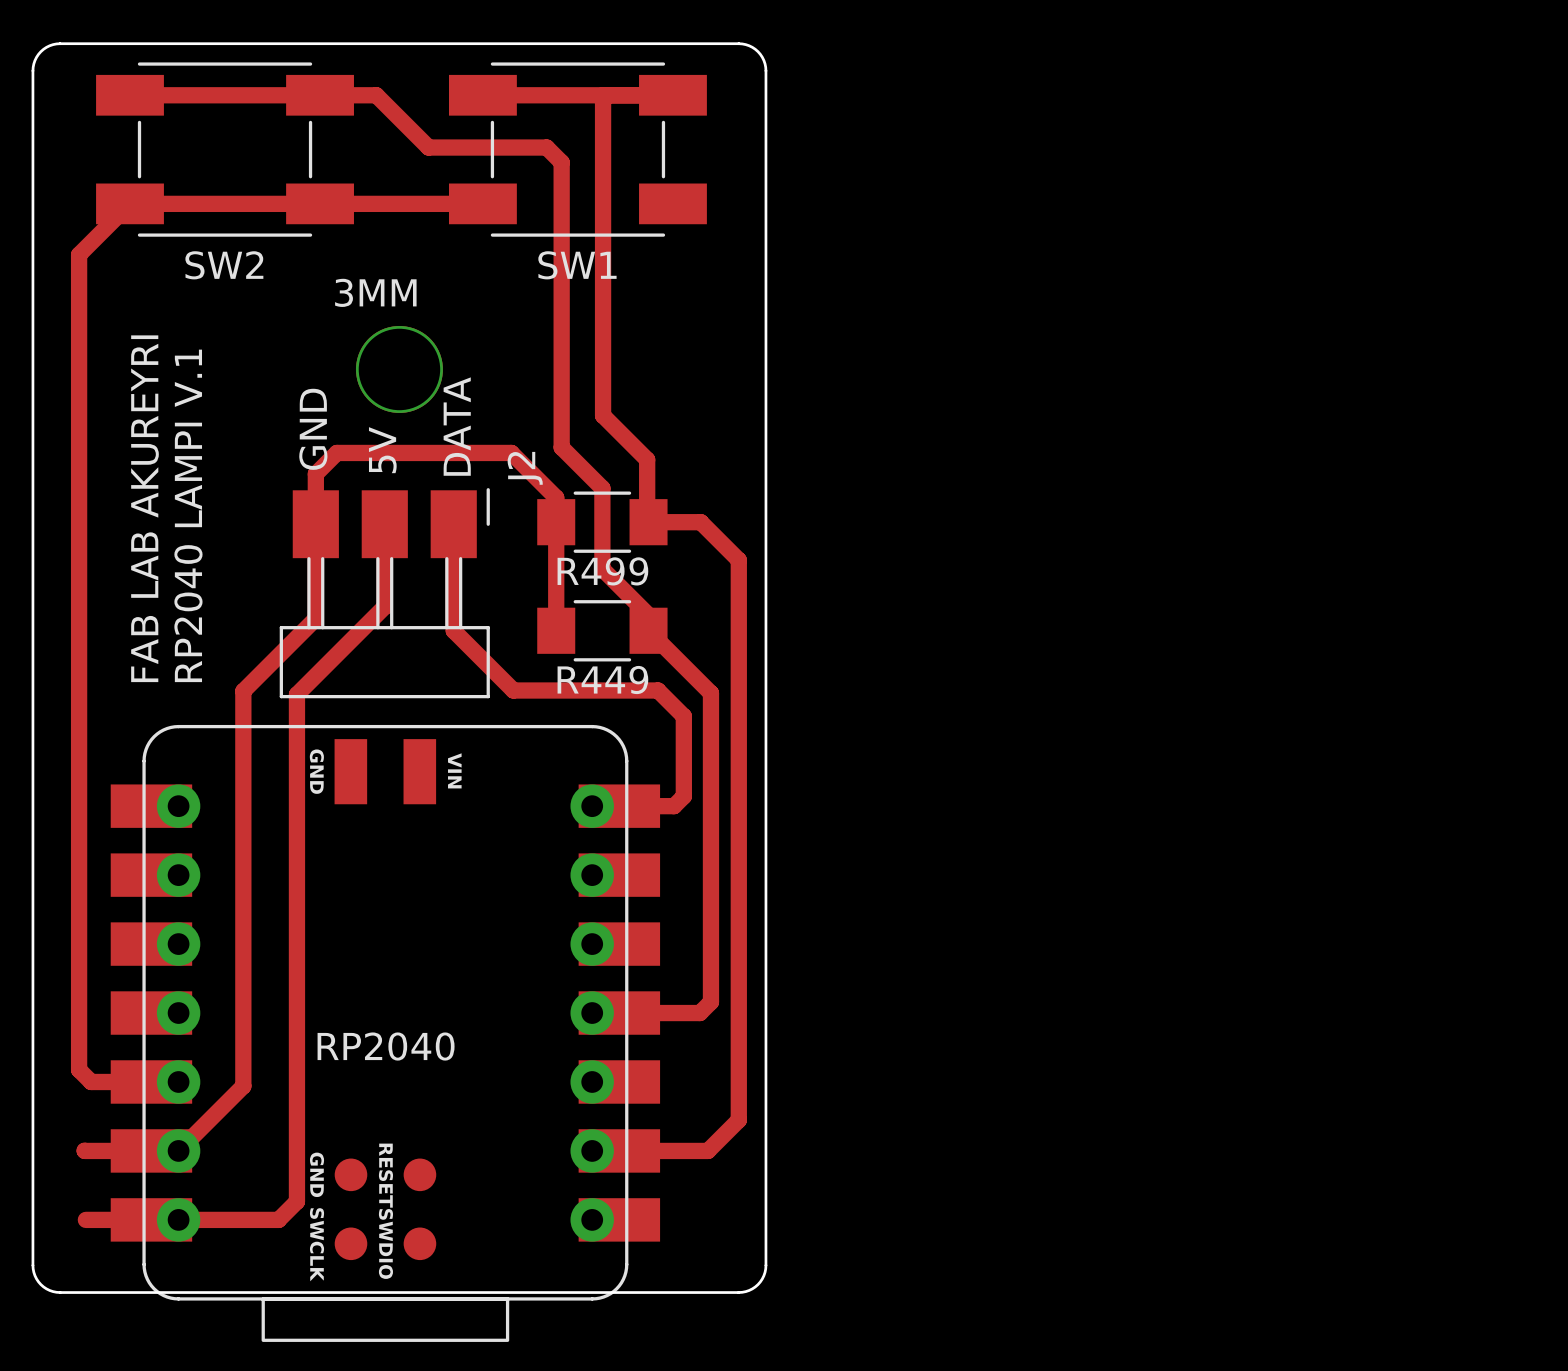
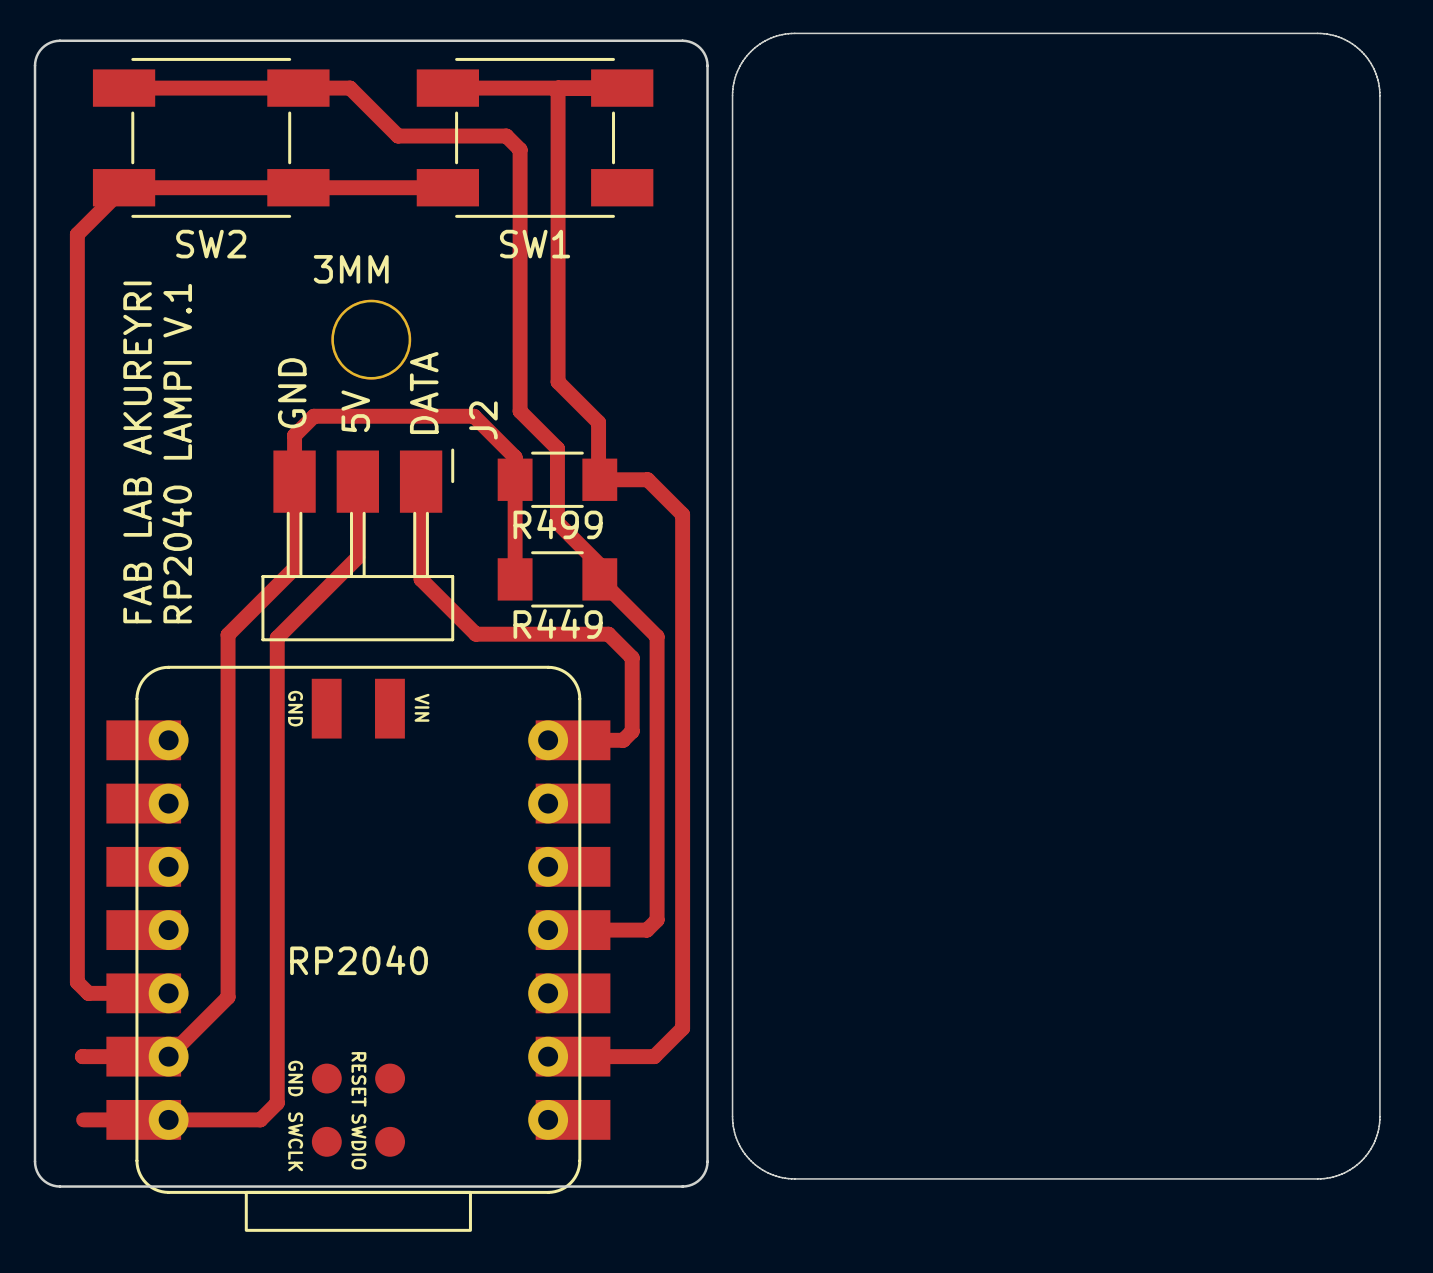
board edge: none -> (791, 33) (770, 38) (750, 51) (737, 71) (732, 92) (732, 1116) (733, 1129) (738, 1143) (746, 1156) (759, 1168) (776, 1176) (791, 1178) (1317, 1178) (1330, 1177) (1344, 1172) (1357, 1164) (1369, 1151) (1377, 1135) (1379, 1119) (1379, 95) (1378, 83) (1373, 68) (1365, 56) (1352, 44) (1336, 36) (1320, 33) (791, 33)

